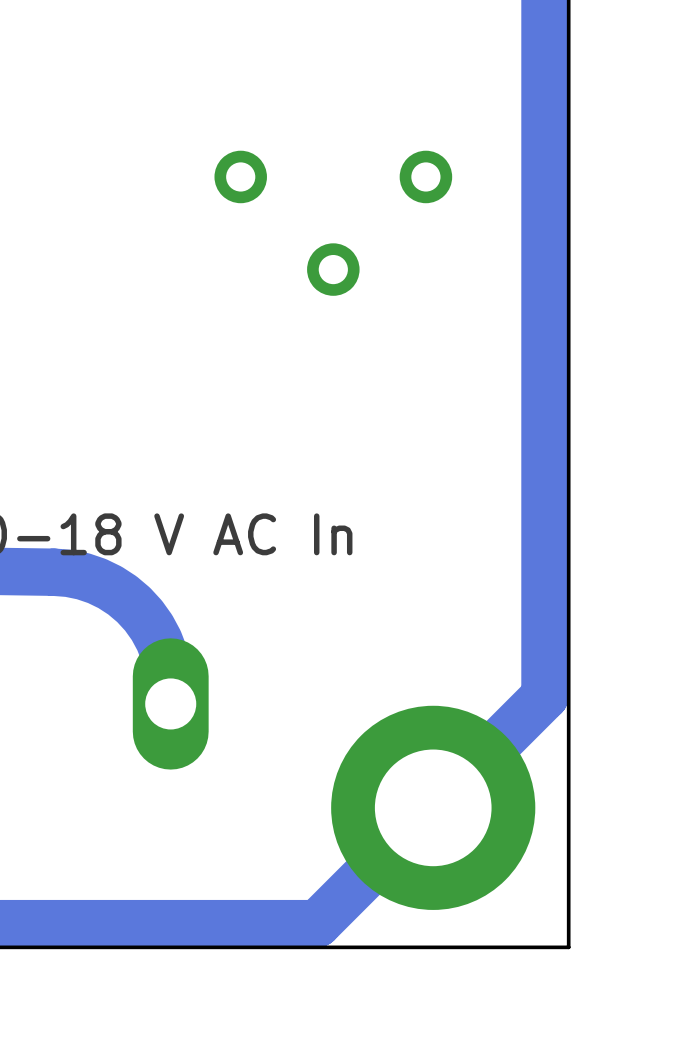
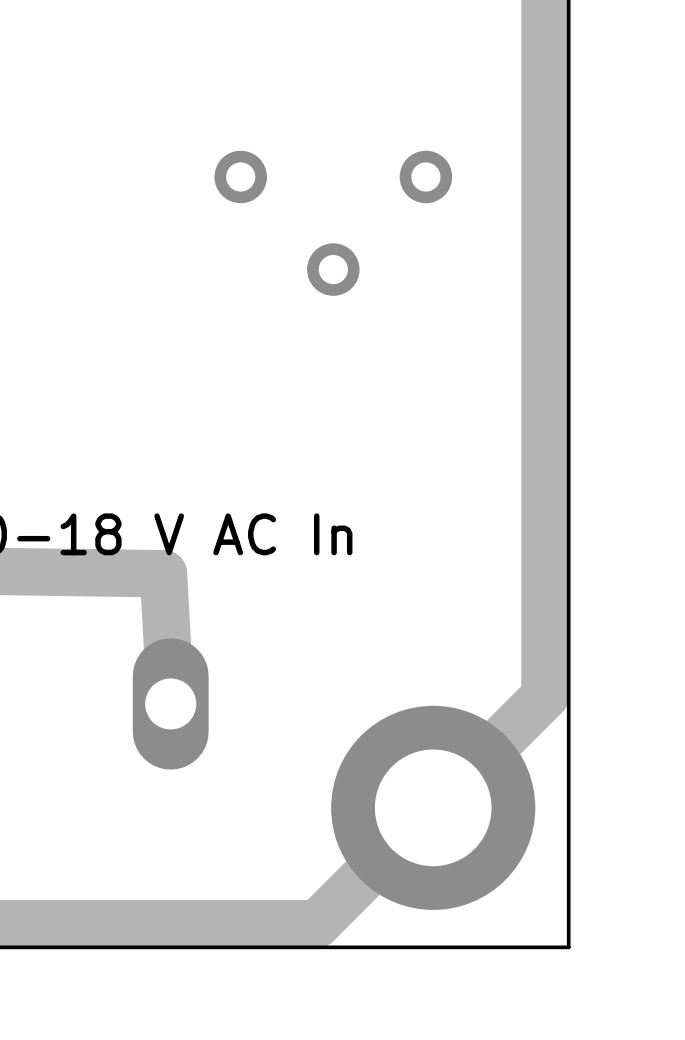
track: (54, 572) (68, 573) (96, 581) (110, 587) (133, 604) (143, 615) (159, 640) (164, 654) (169, 683) -> (54, 572) (163, 573) (169, 683)

